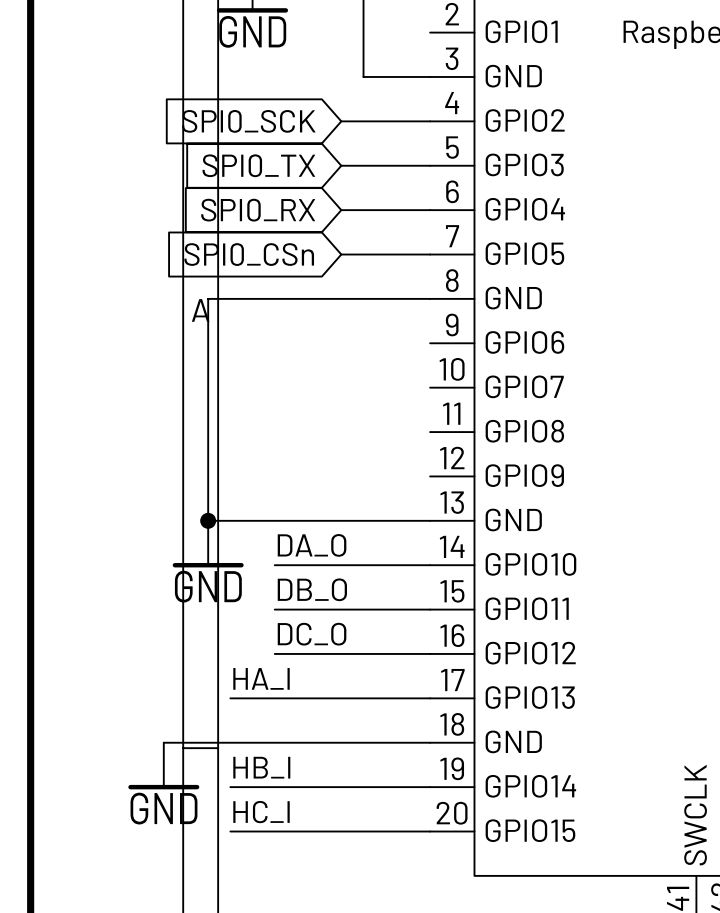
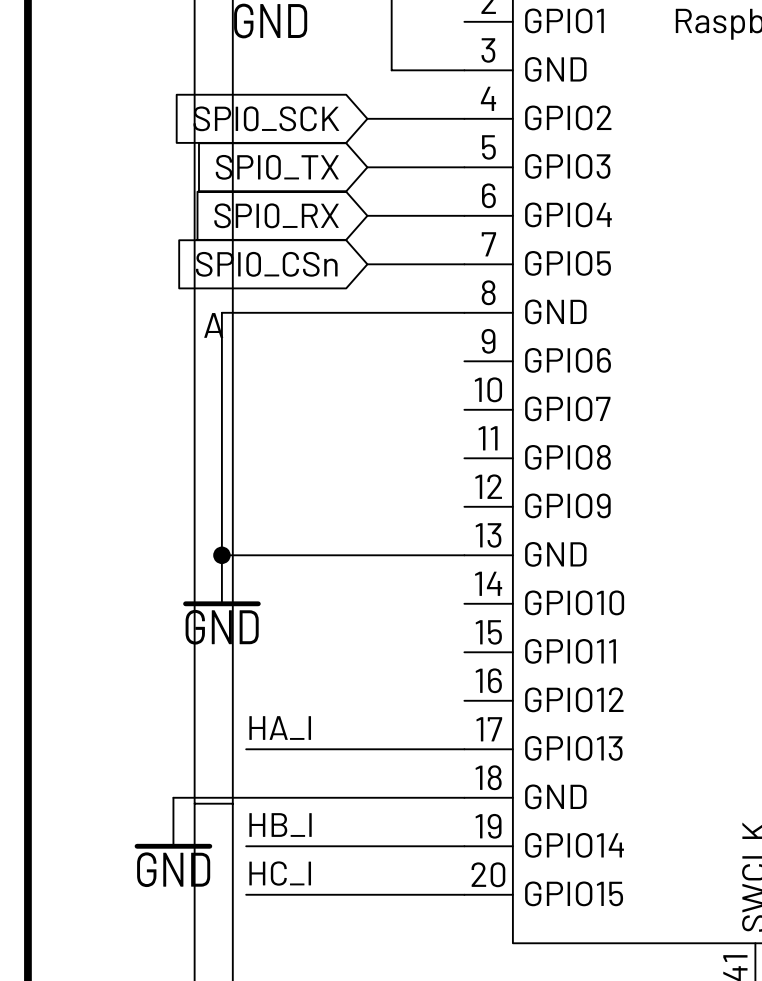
label: DA_O (312, 545) -> none
wire: (274, 565) (430, 565) -> none
label: DB_O (312, 589) -> none
wire: (274, 609) (430, 609) -> none
label: DC_O (312, 634) -> none
wire: (274, 653) (430, 653) -> none

